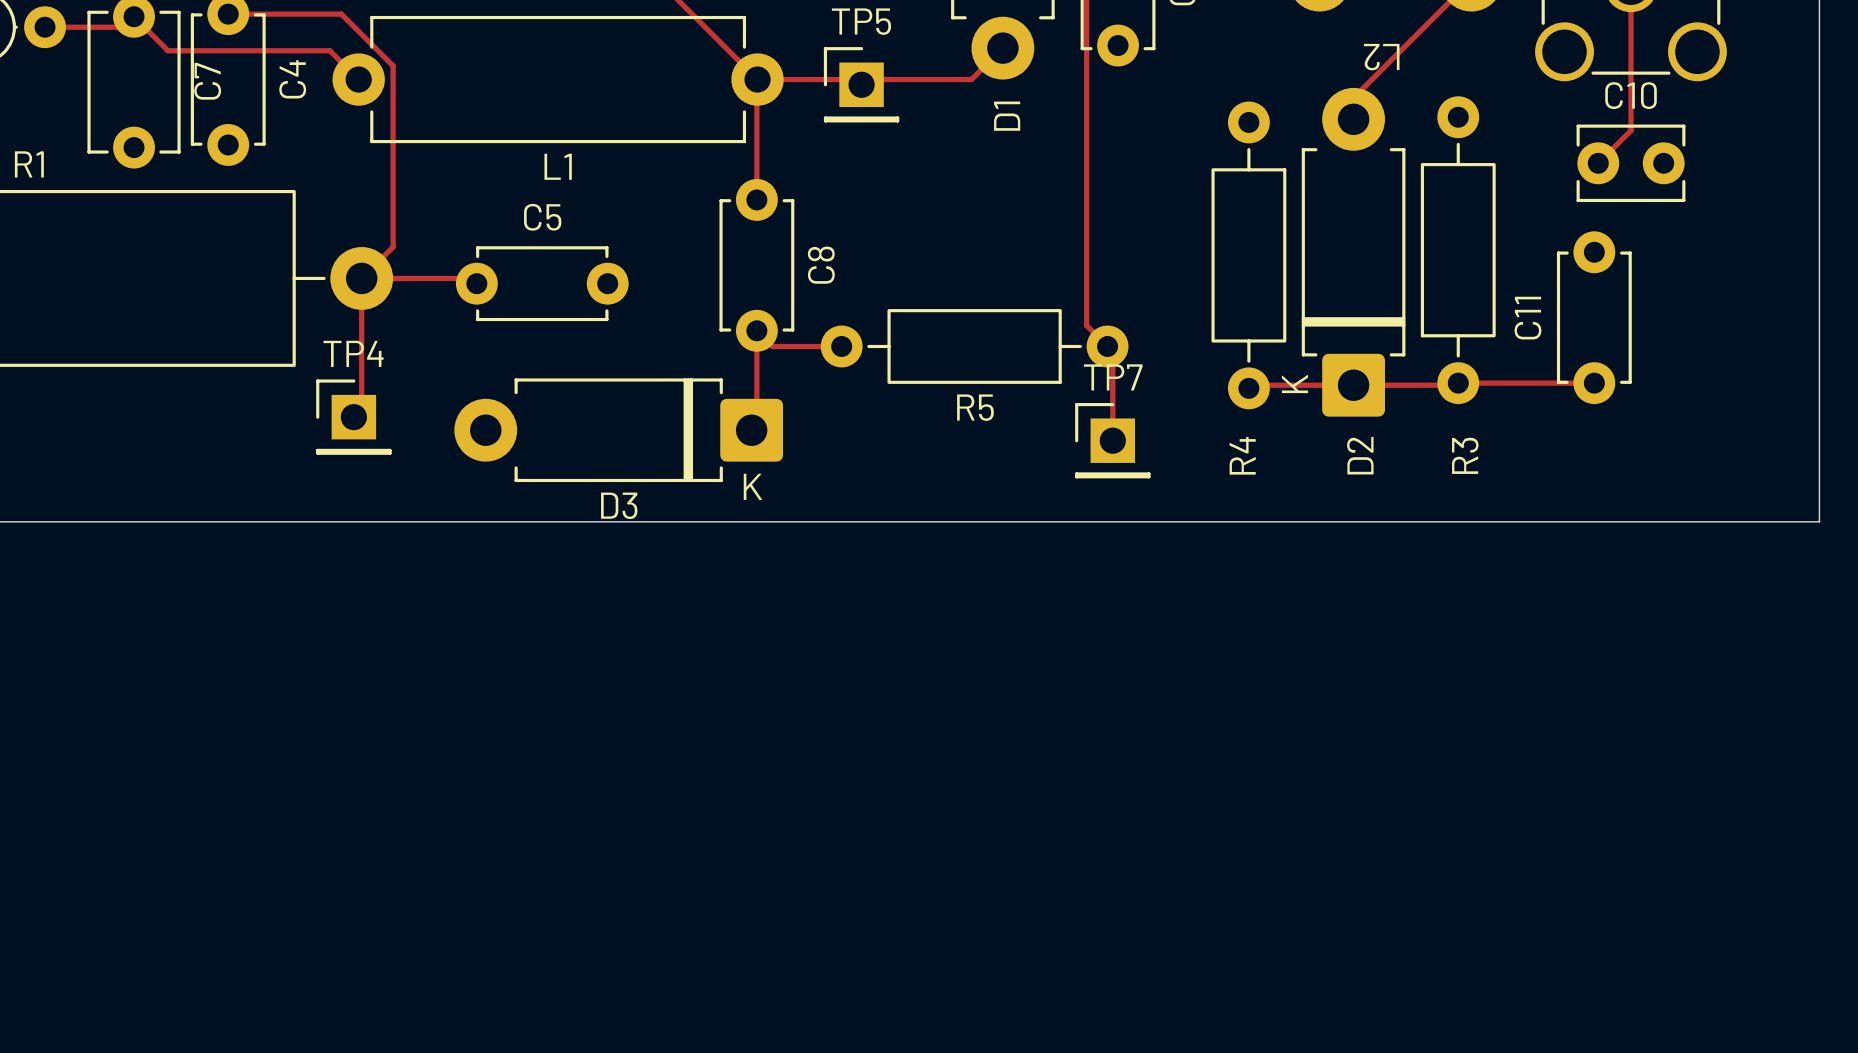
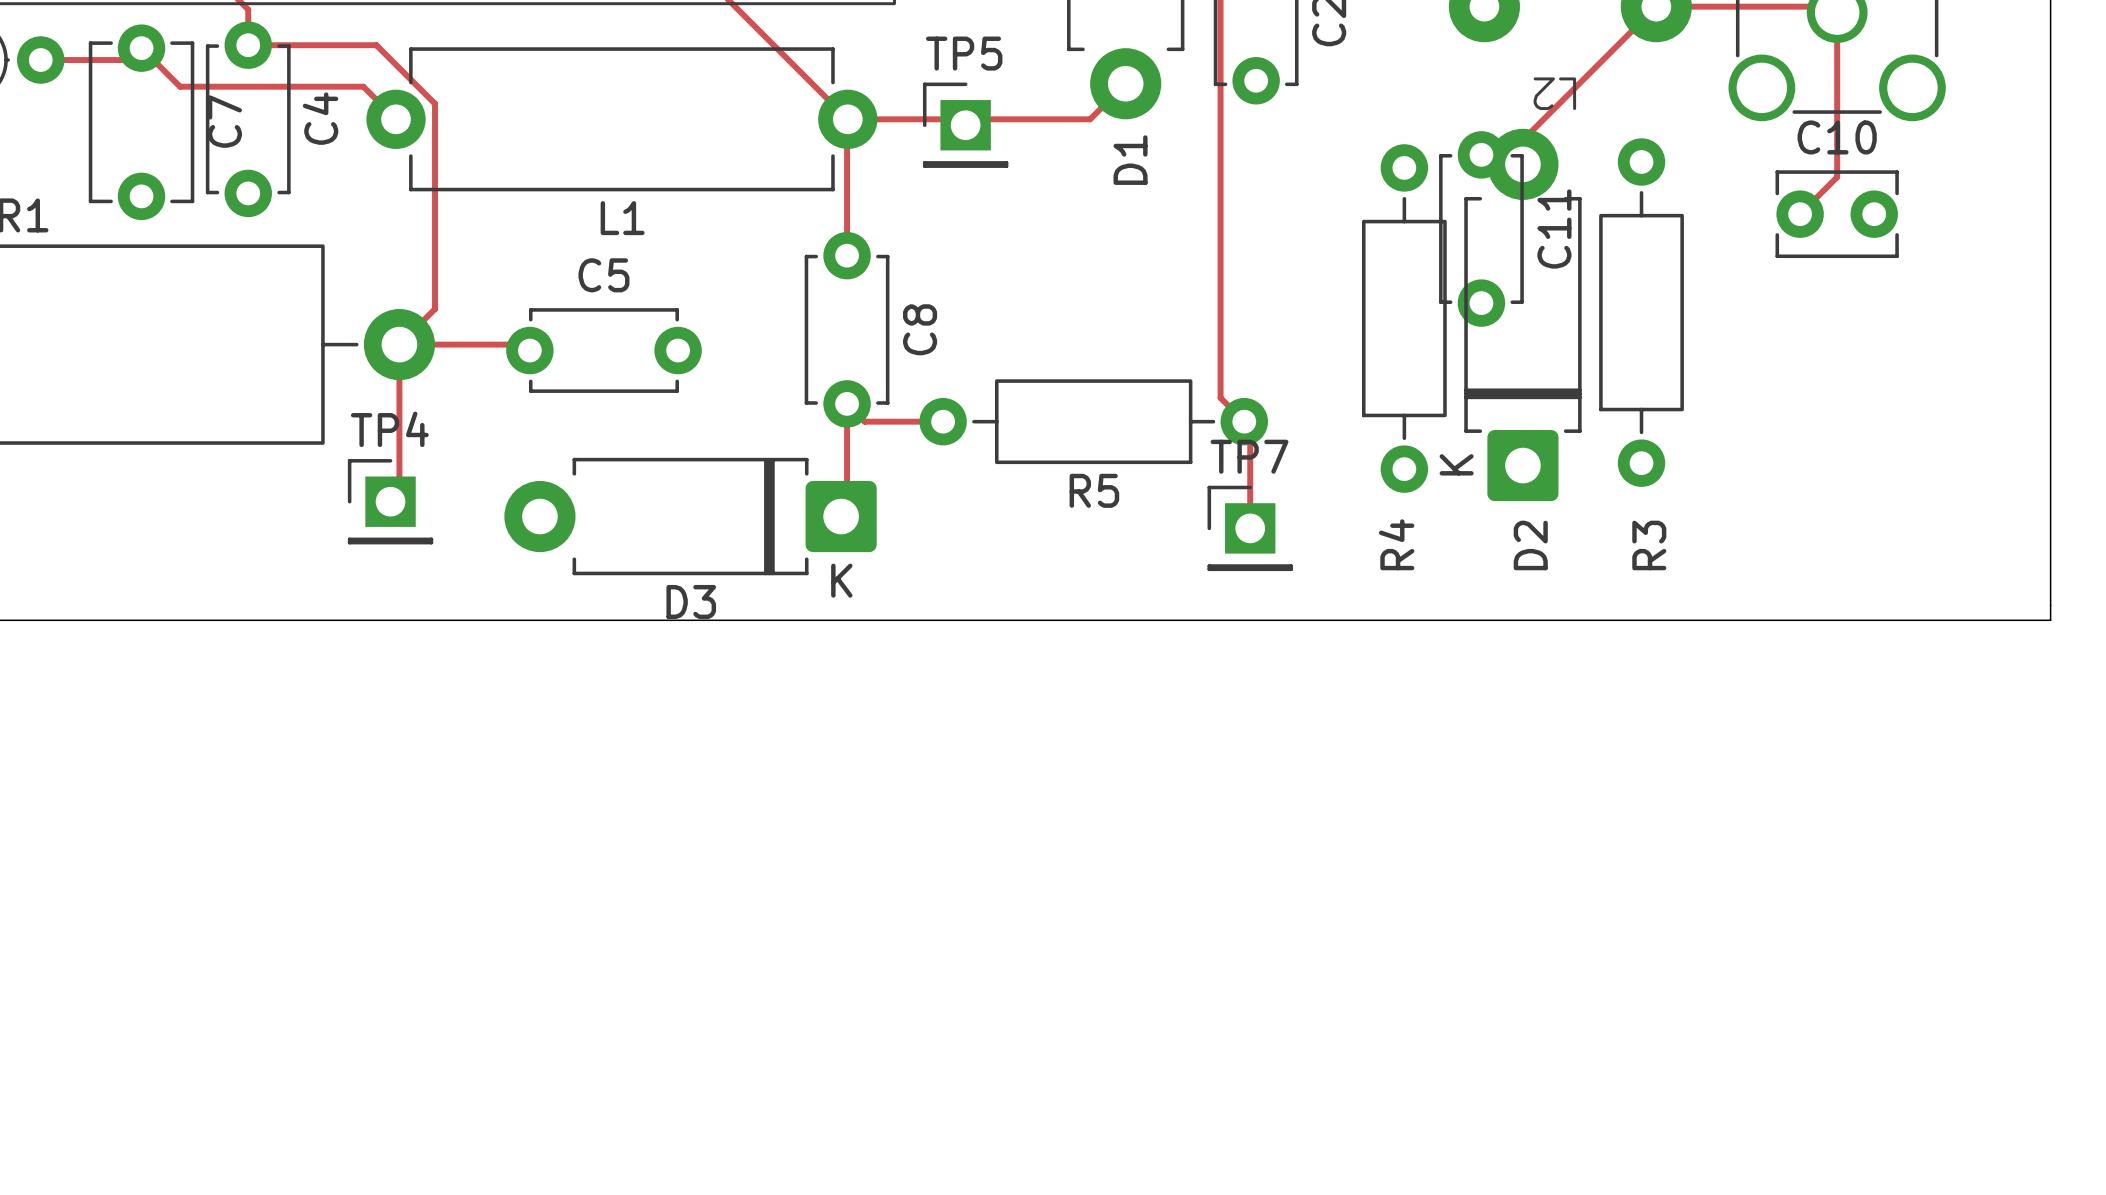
C11 position: (1594, 317) -> (1481, 228)
C11 name position: C11 (1527, 318) -> C11 (1554, 228)
track: (1594, 383) (1252, 385) (1248, 388) -> none

